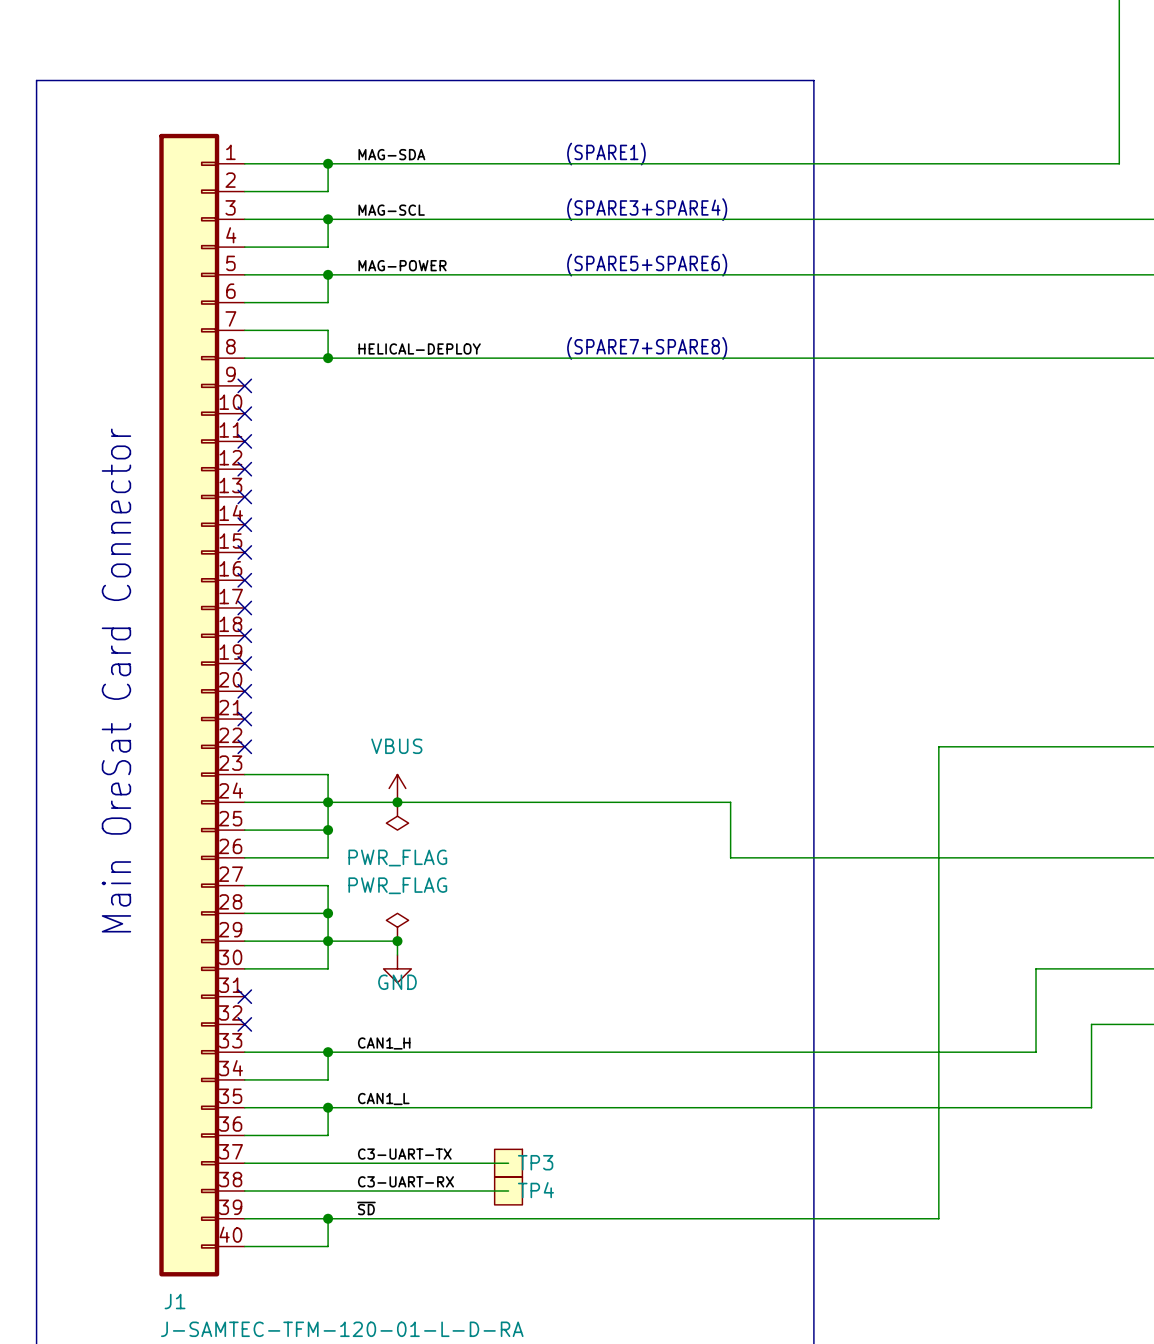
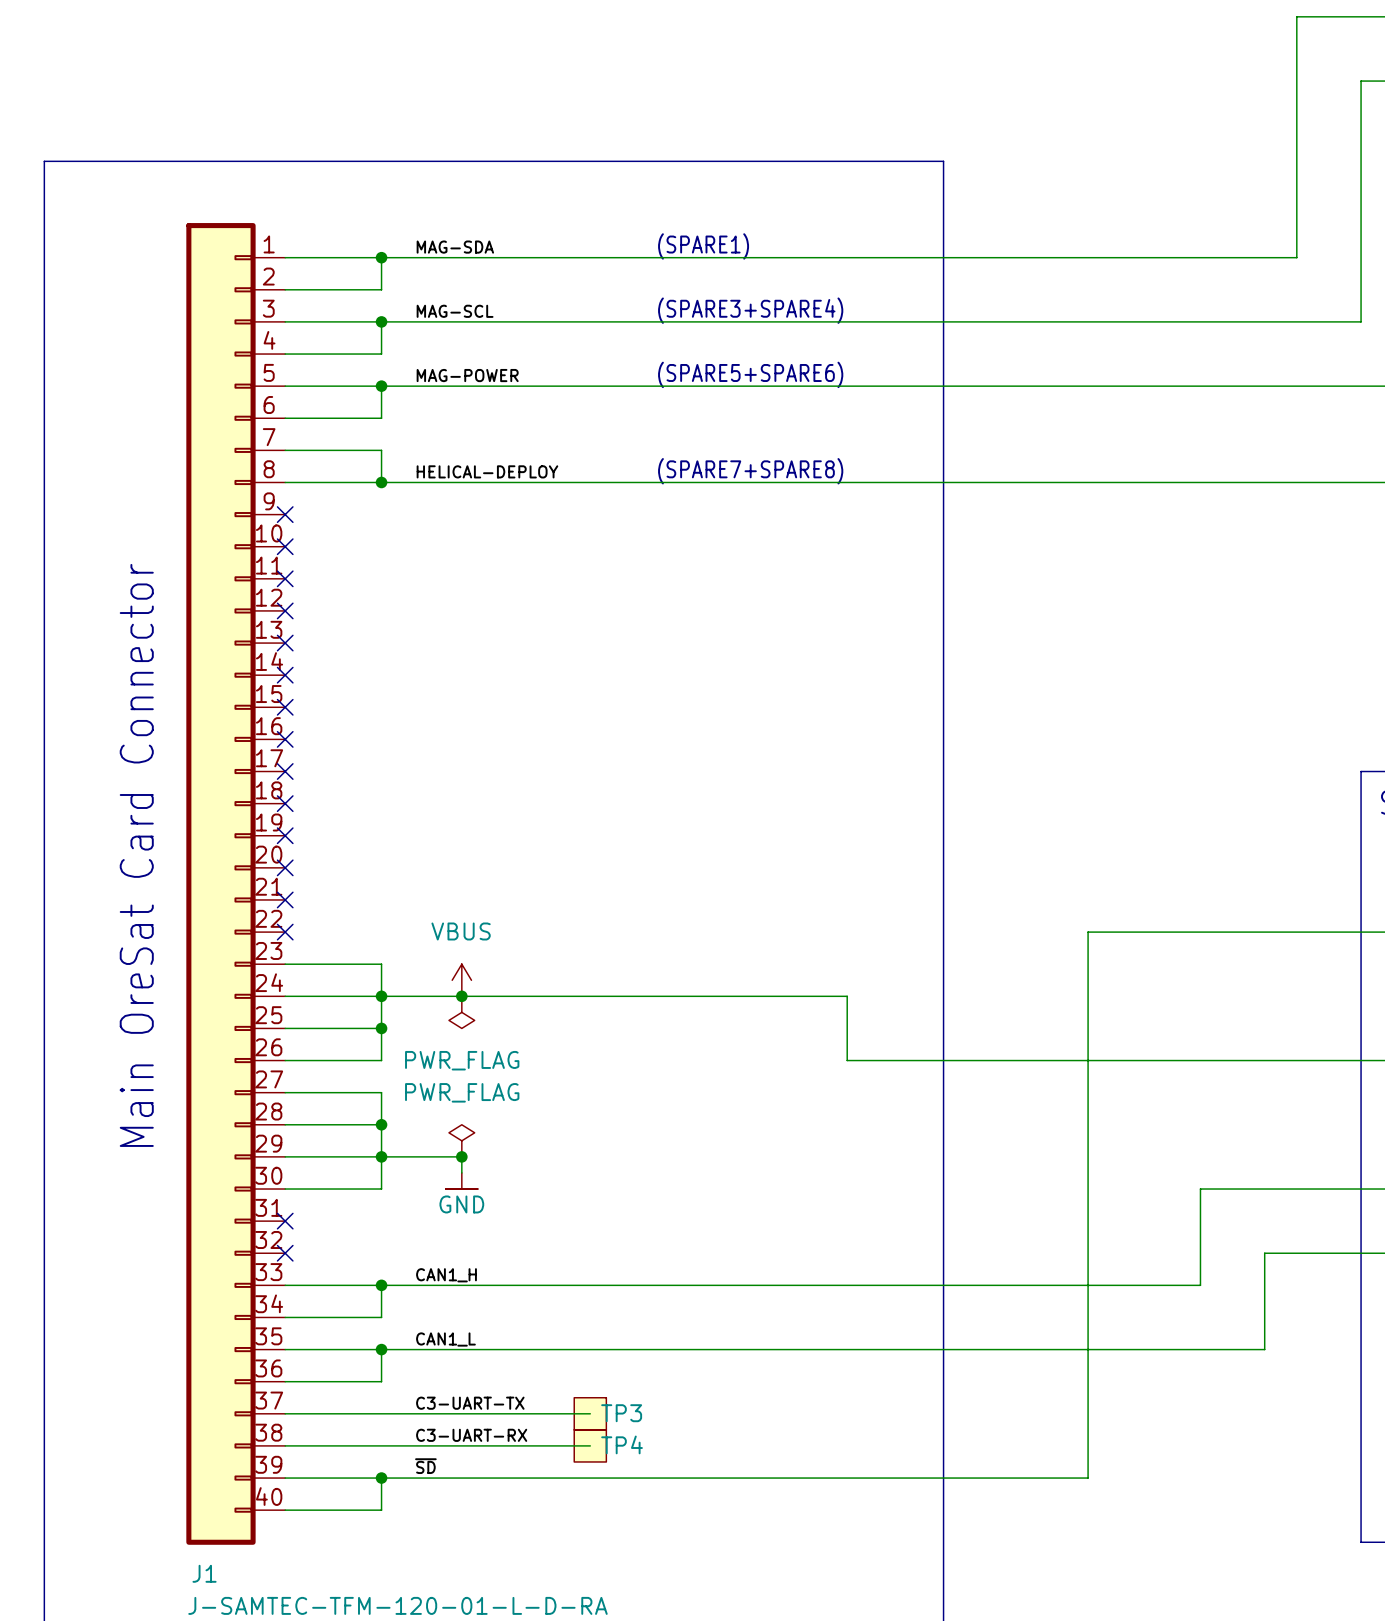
power symbol shape: [383, 955, 412, 983] -> [445, 1172, 478, 1190]

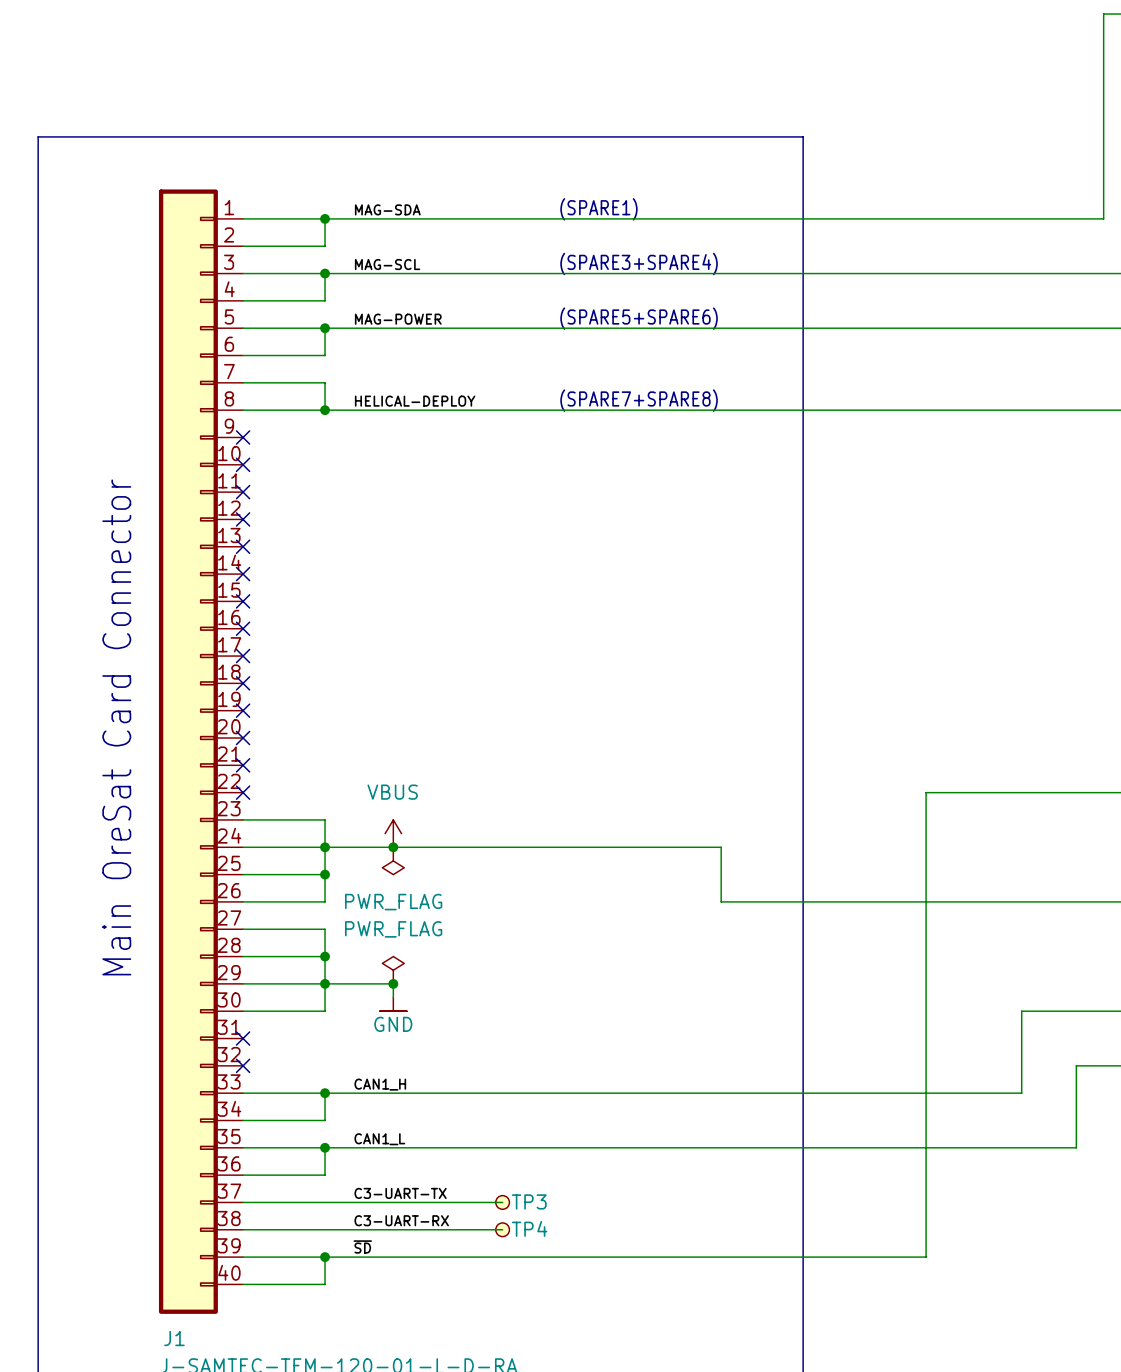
TP3 symbol: [574, 1397, 607, 1430] -> [495, 1195, 510, 1210]
TP4 symbol: [574, 1429, 607, 1462] -> [495, 1222, 510, 1237]

